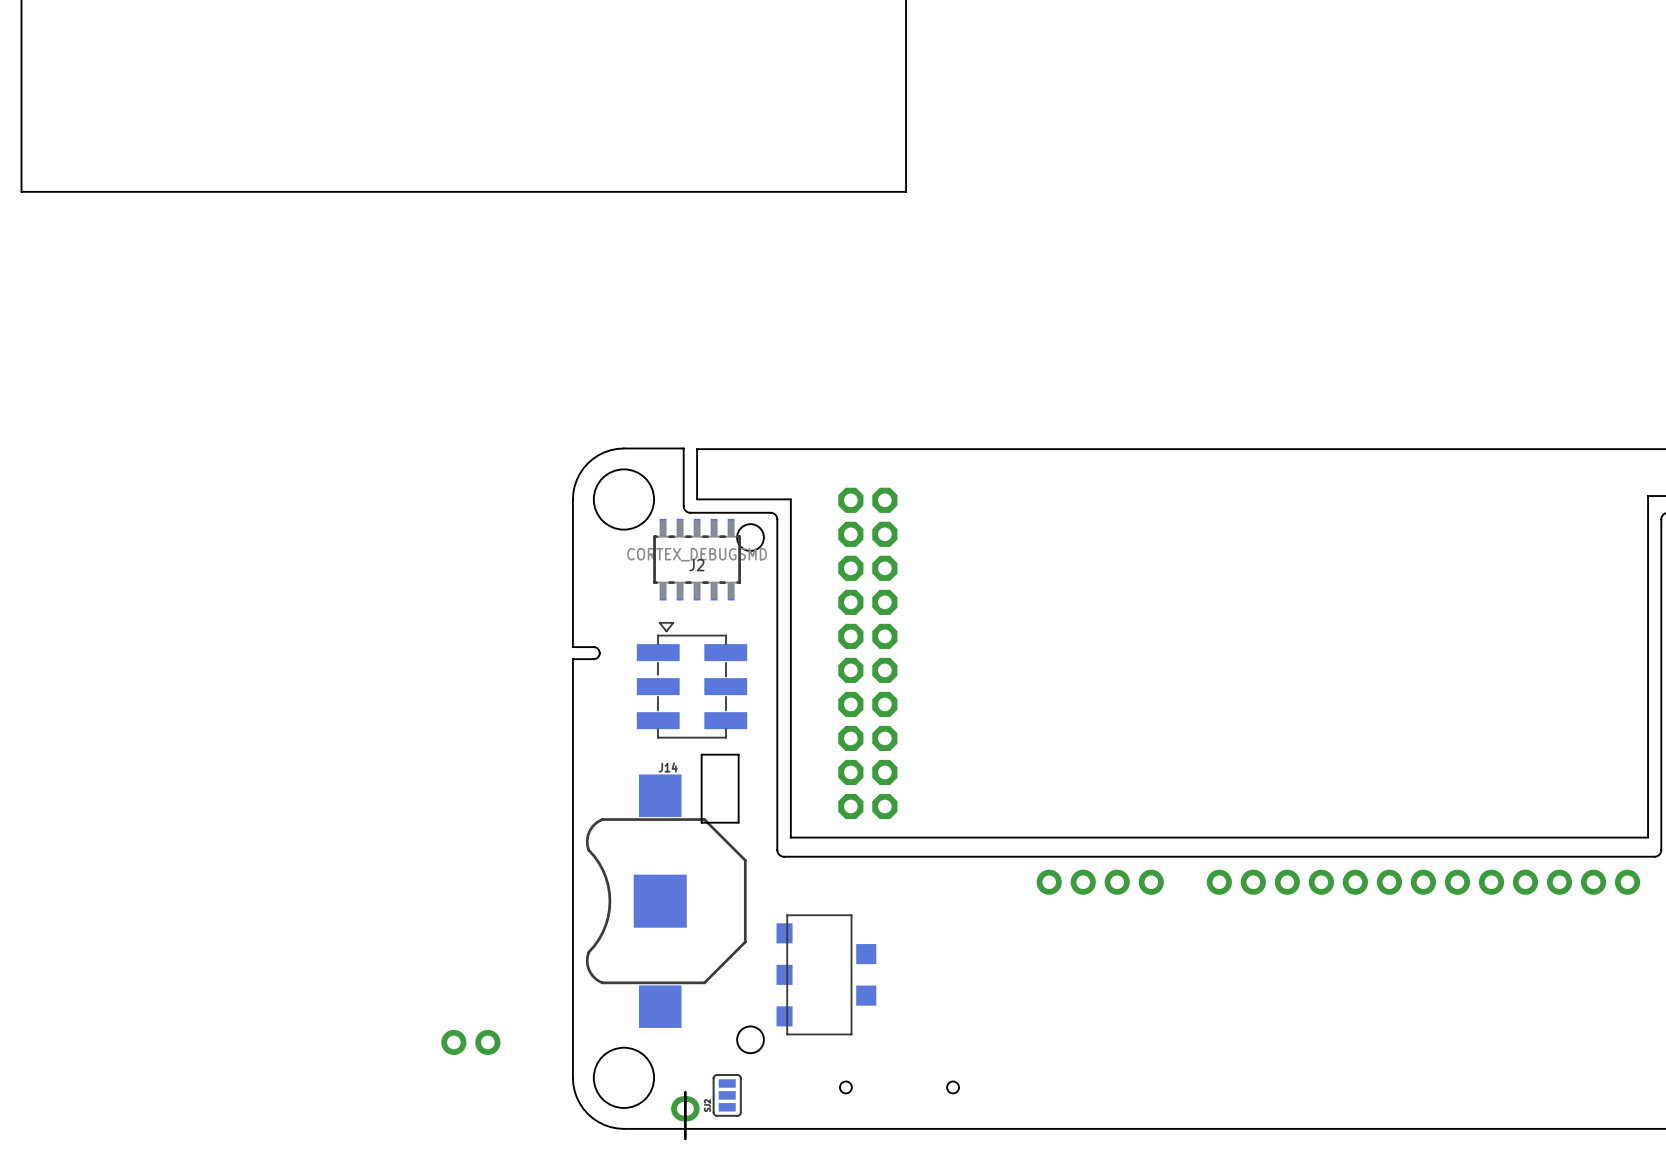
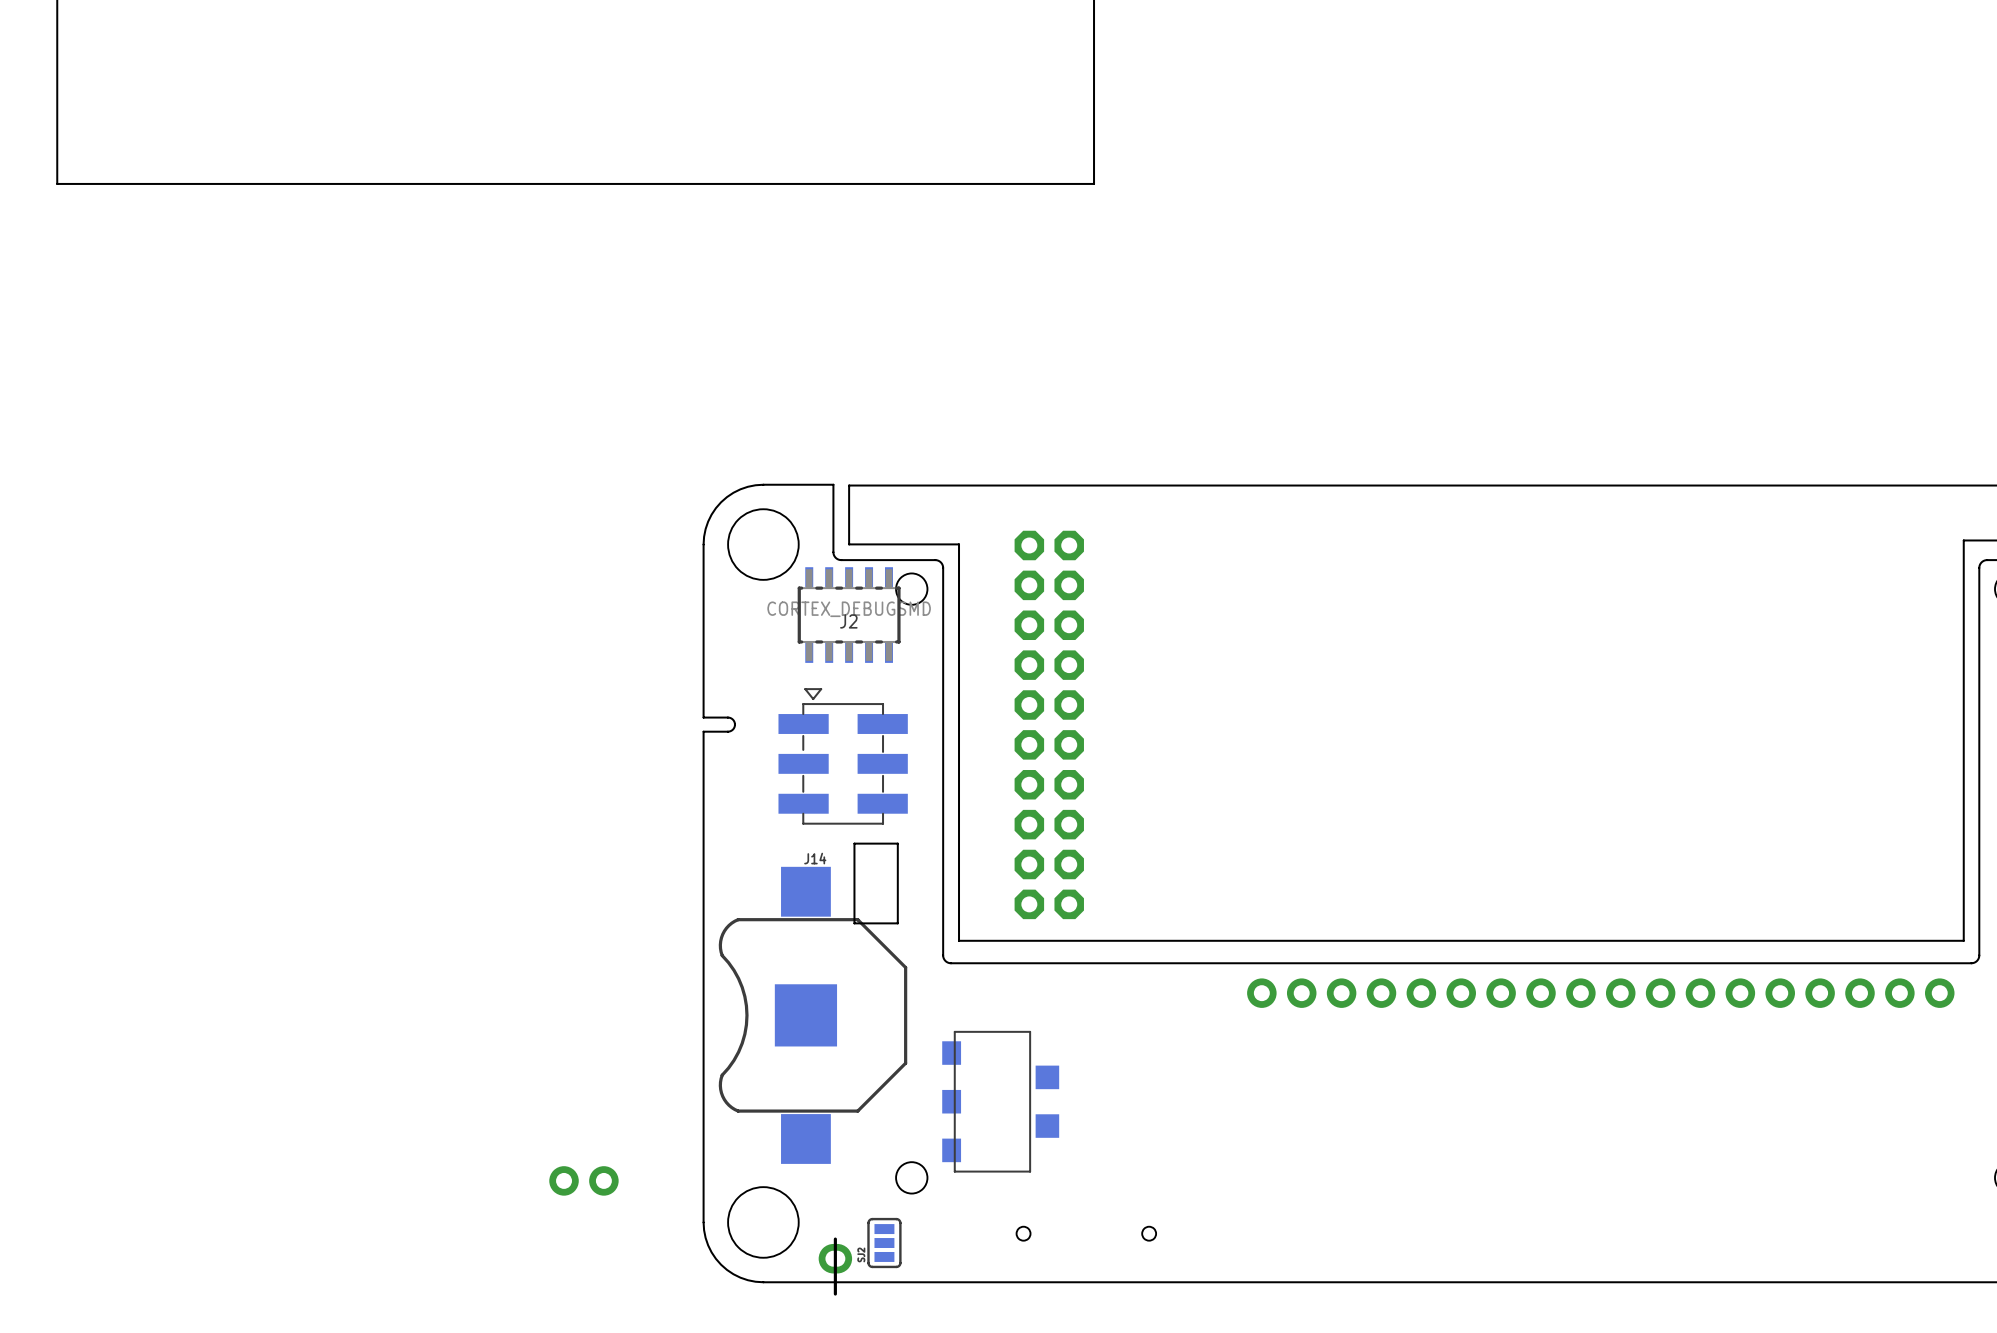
part: none -> (1421, 993)

